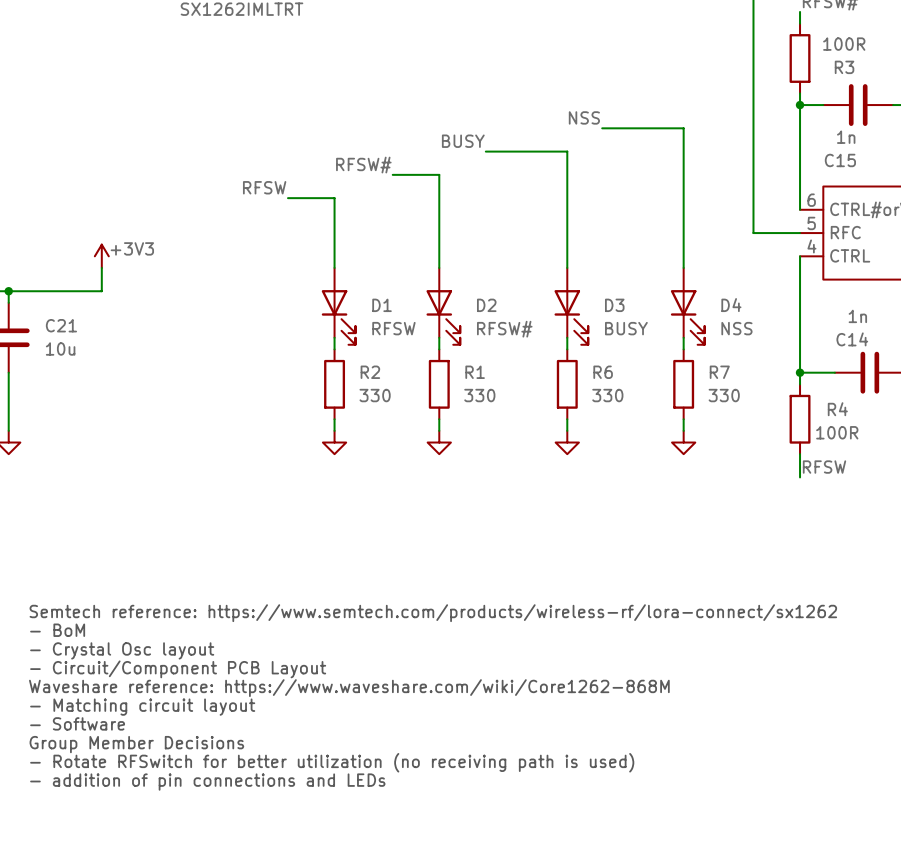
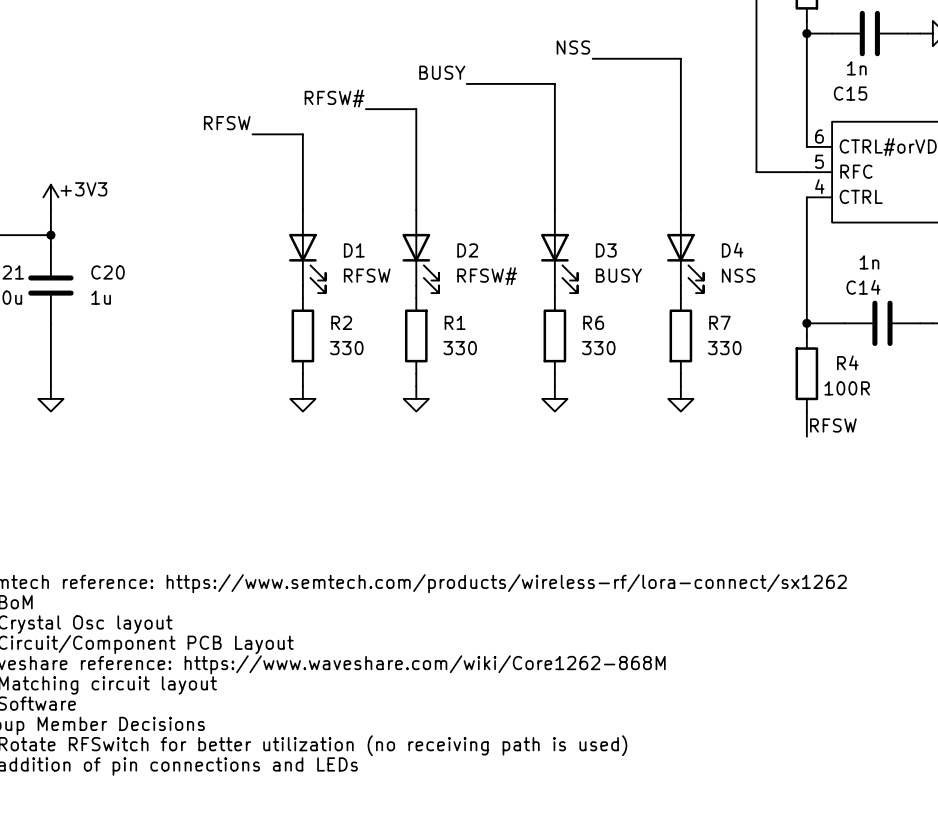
wire: none -> (50, 235) (50, 247)
junction: none -> (50, 235)
C20: none -> 1u (50, 285)
wire: none -> (50, 323) (50, 386)
power symbol: none -> (50, 398)

